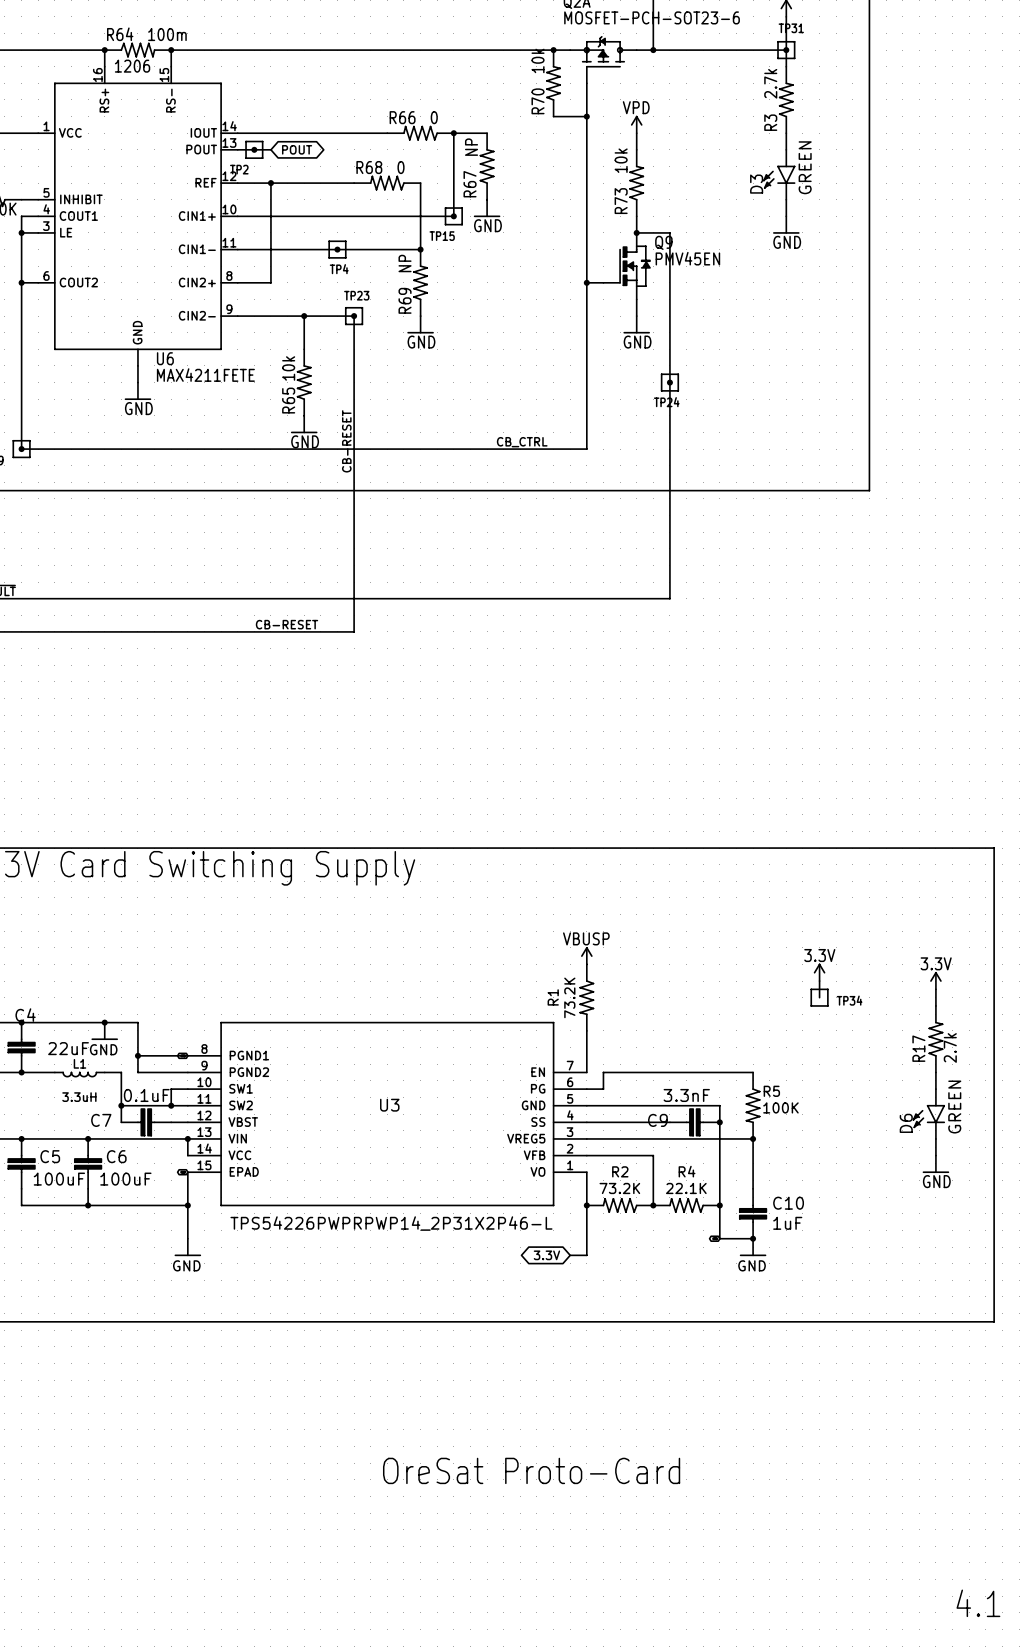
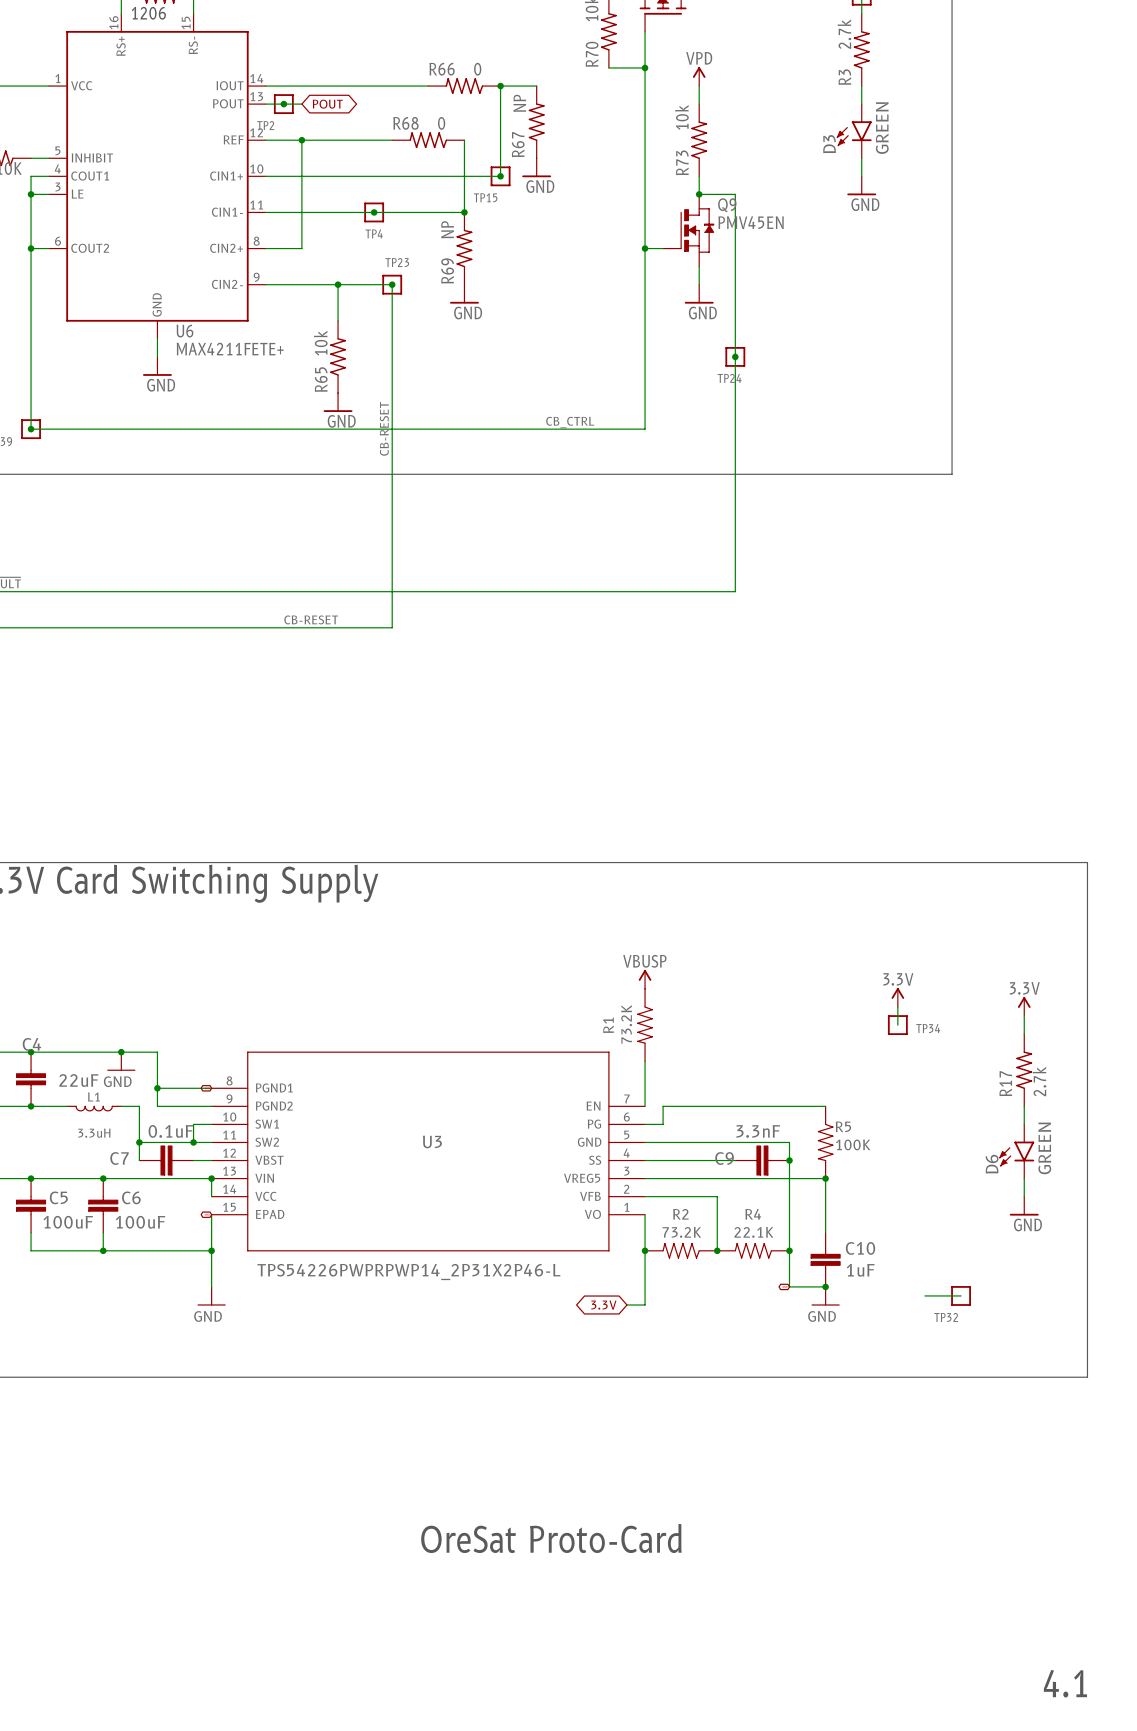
U6 value: MAX4211FETE (205, 375) -> MAX4211FETE+ (230, 349)
wire: none -> (924, 1295) (961, 1295)
TP32: none -> (961, 1295)

